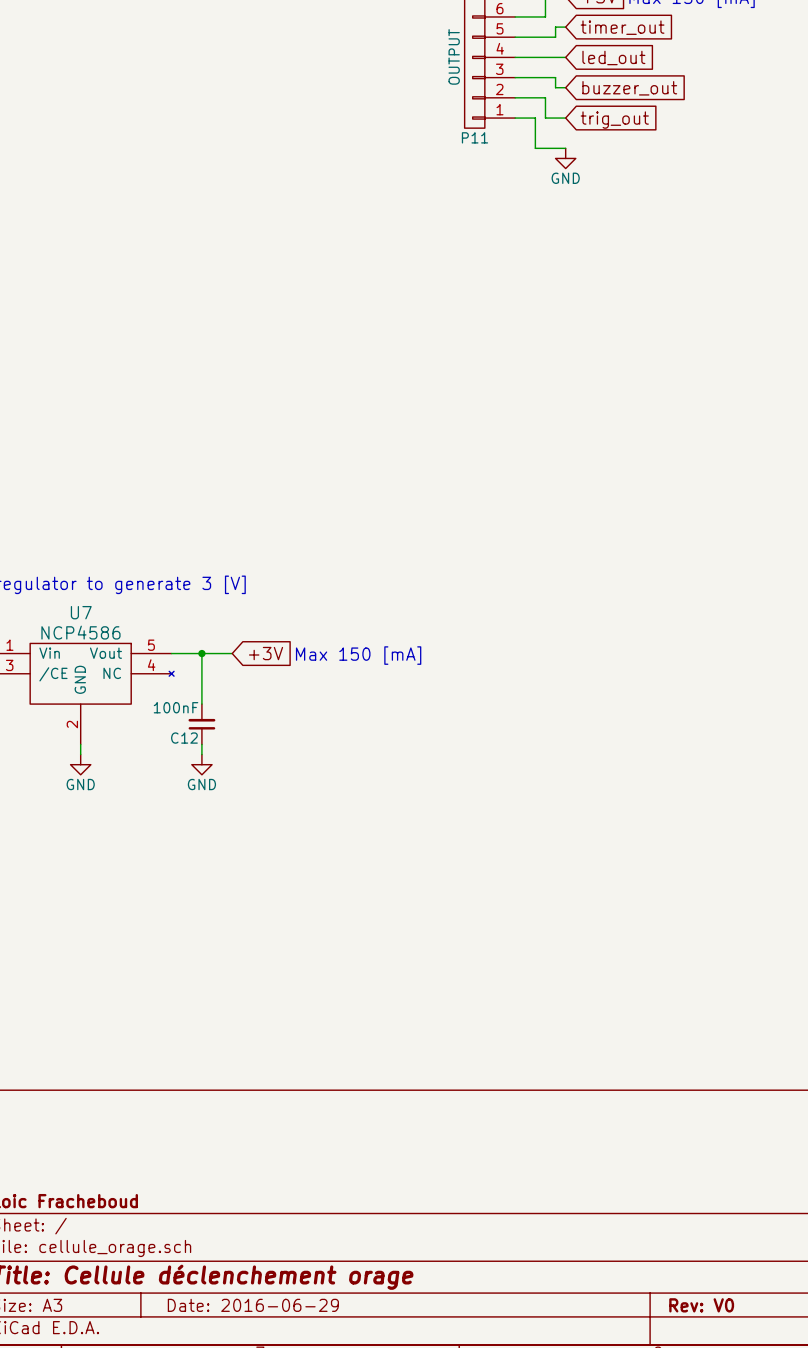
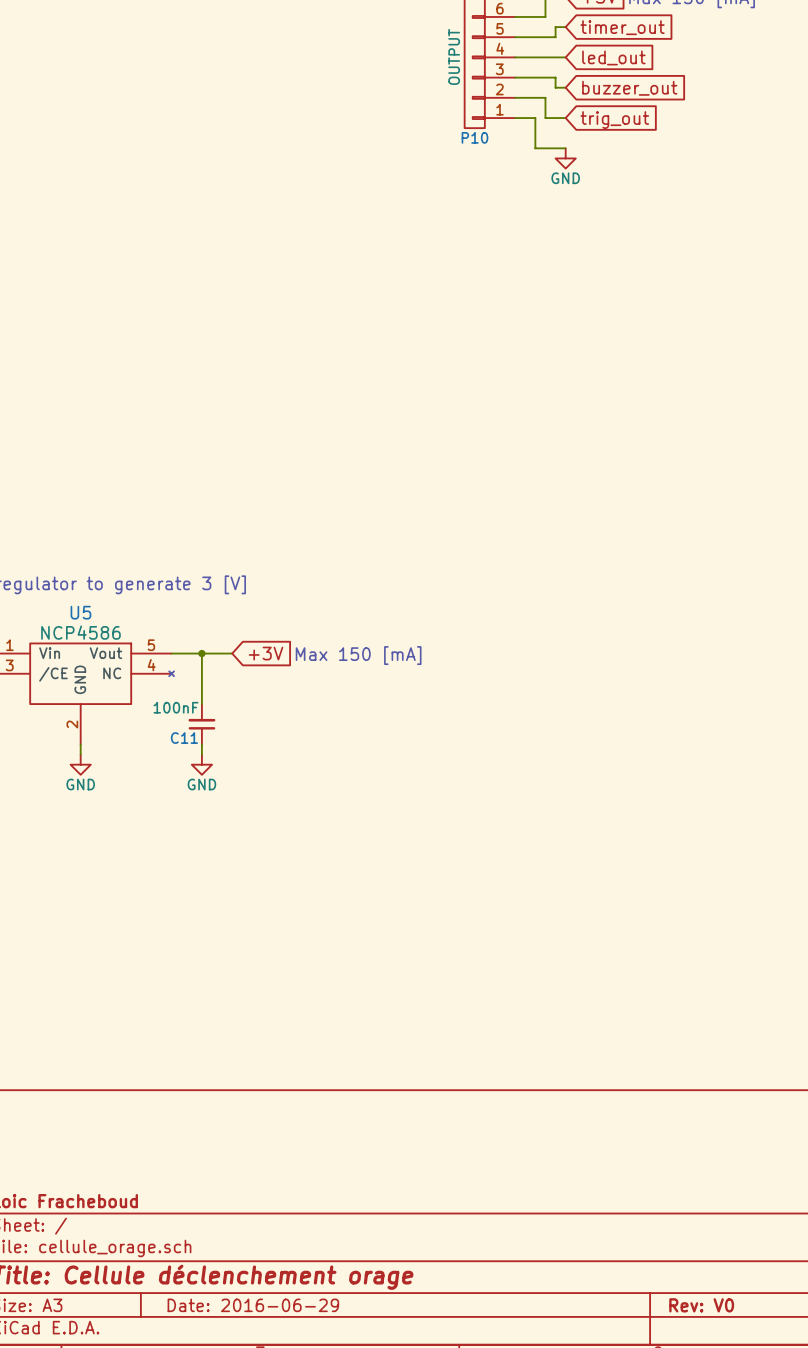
P11 name: P11 (474, 137) -> P10 (474, 137)
U7 name: U7 (81, 612) -> U5 (80, 612)
C12 name: C12 (184, 738) -> C11 (184, 738)

